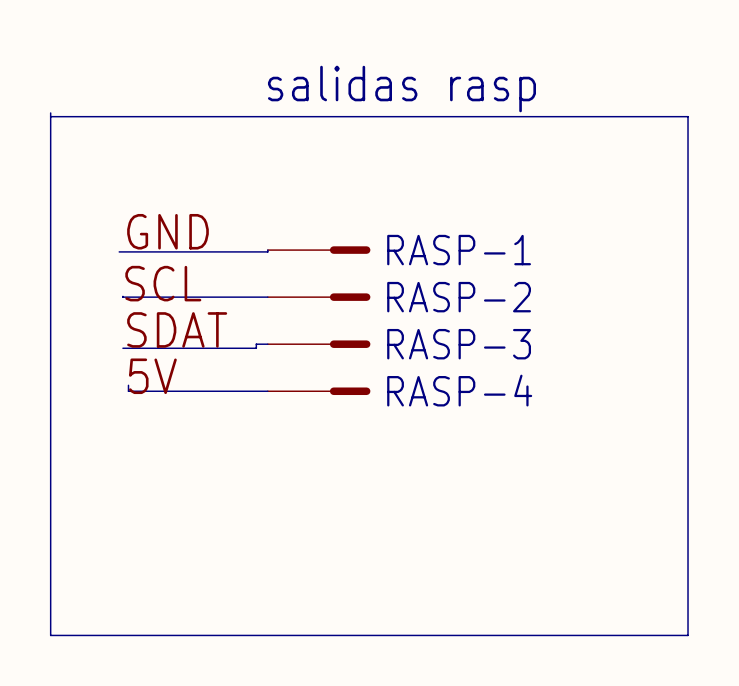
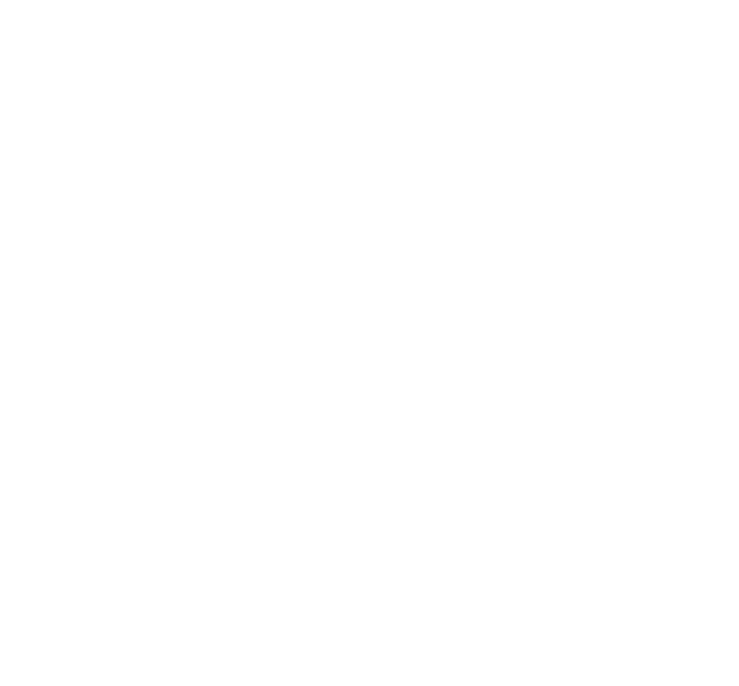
text: salidas rasp (401, 89) -> none
wire: (50, 112) (50, 635) (688, 635) (688, 116) (50, 116) -> none
label: GND (167, 231) -> none
wire: (267, 250) (267, 251) (119, 251) -> none
RASP-1: (319, 250) -> none
label: SCL (163, 283) -> none
wire: (122, 296) (267, 297) -> none
RASP-2: (319, 297) -> none
label: SDAT (177, 329) -> none
wire: (267, 344) (256, 344) (256, 348) (122, 348) -> none
RASP-3: (319, 344) -> none
label: 5V (152, 376) -> none
wire: (128, 385) (128, 391) (267, 391) -> none
RASP-4: (319, 391) -> none

